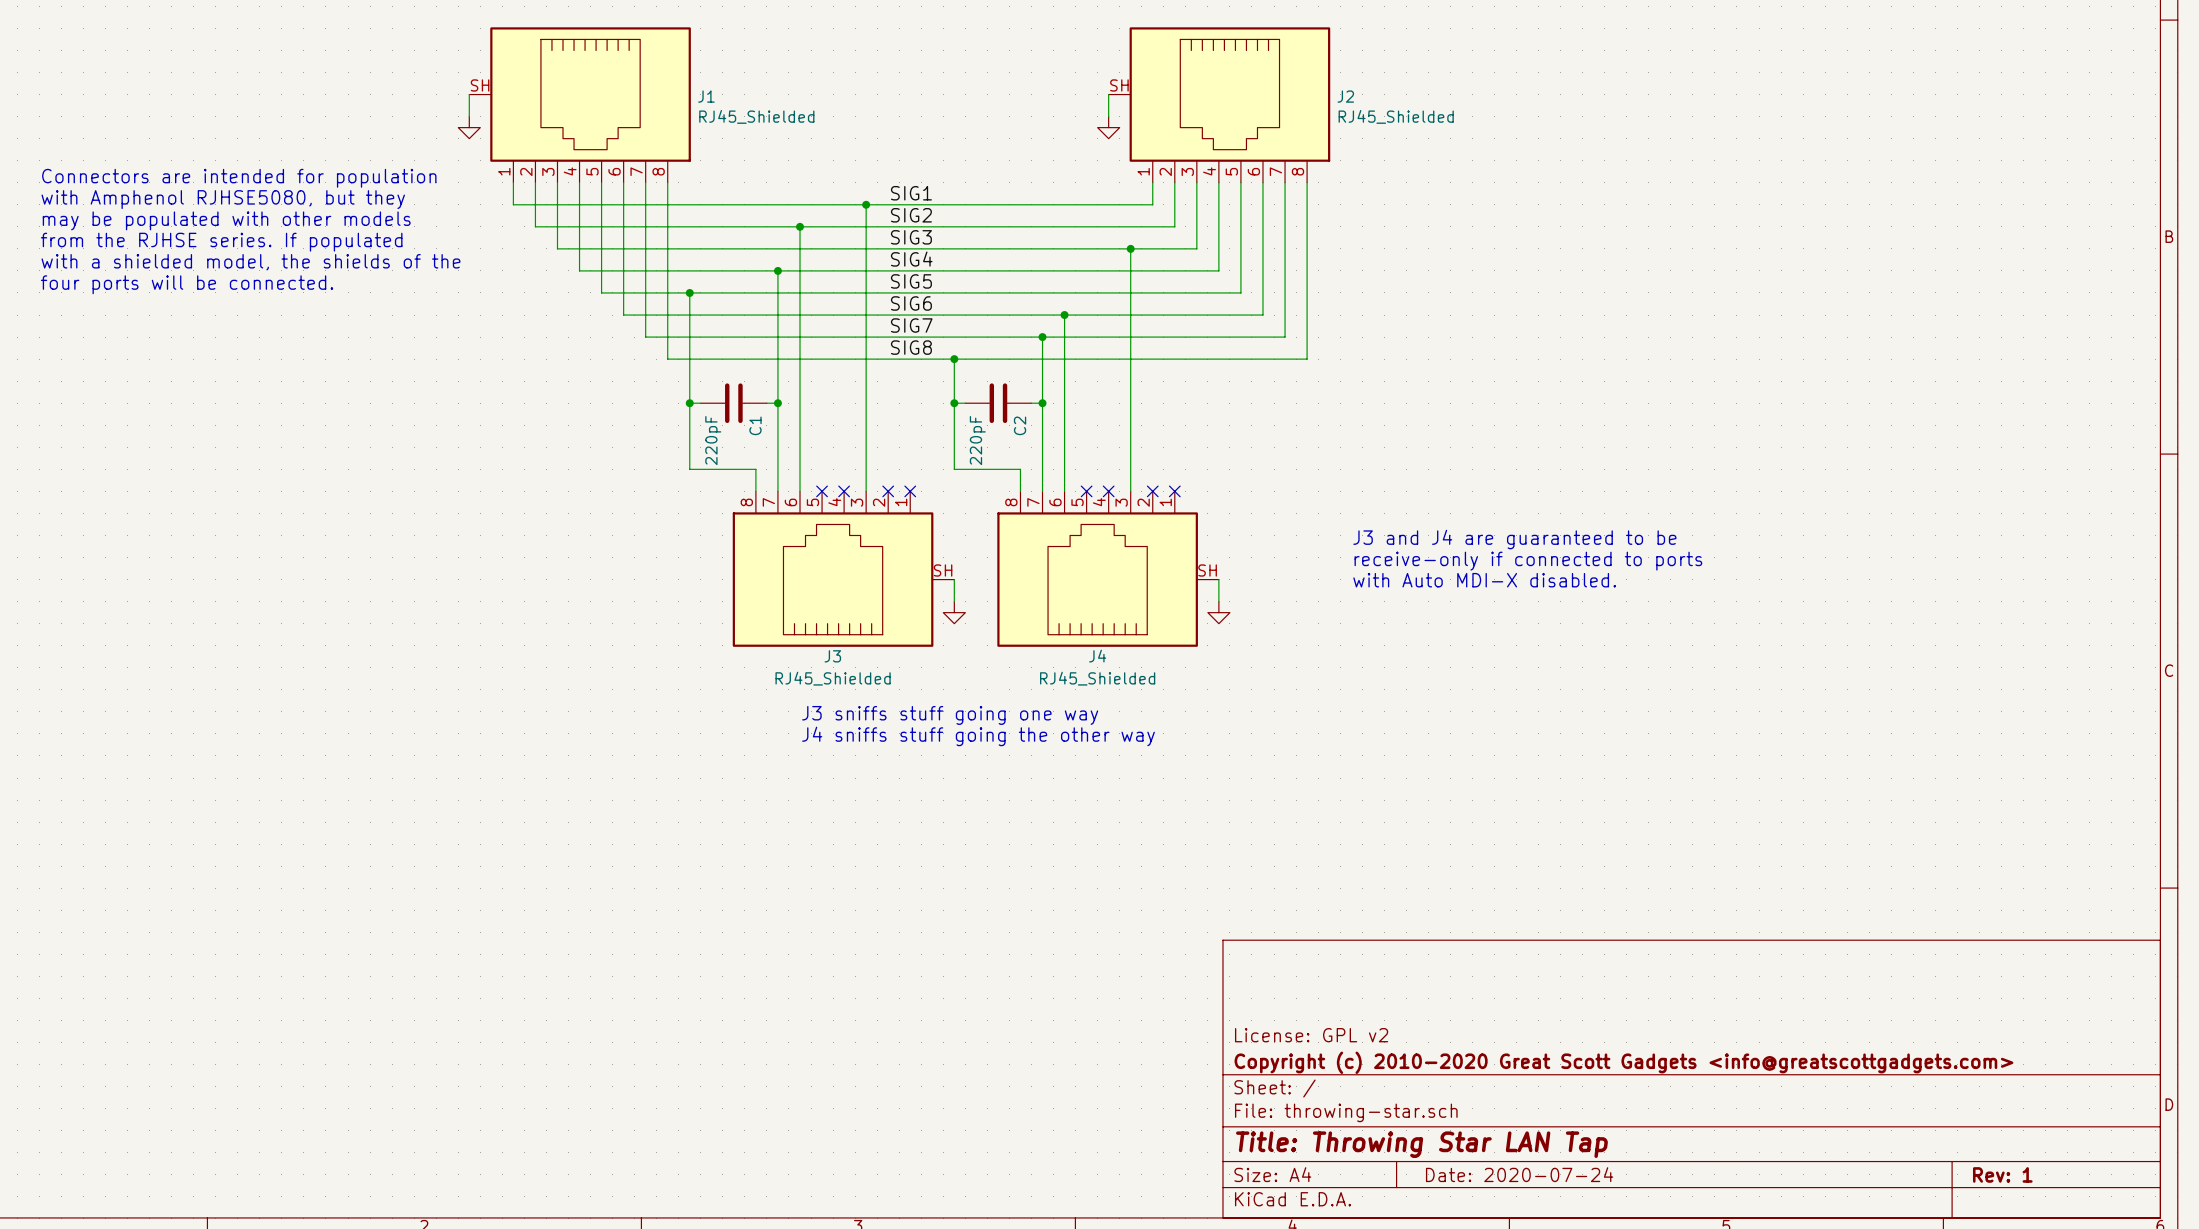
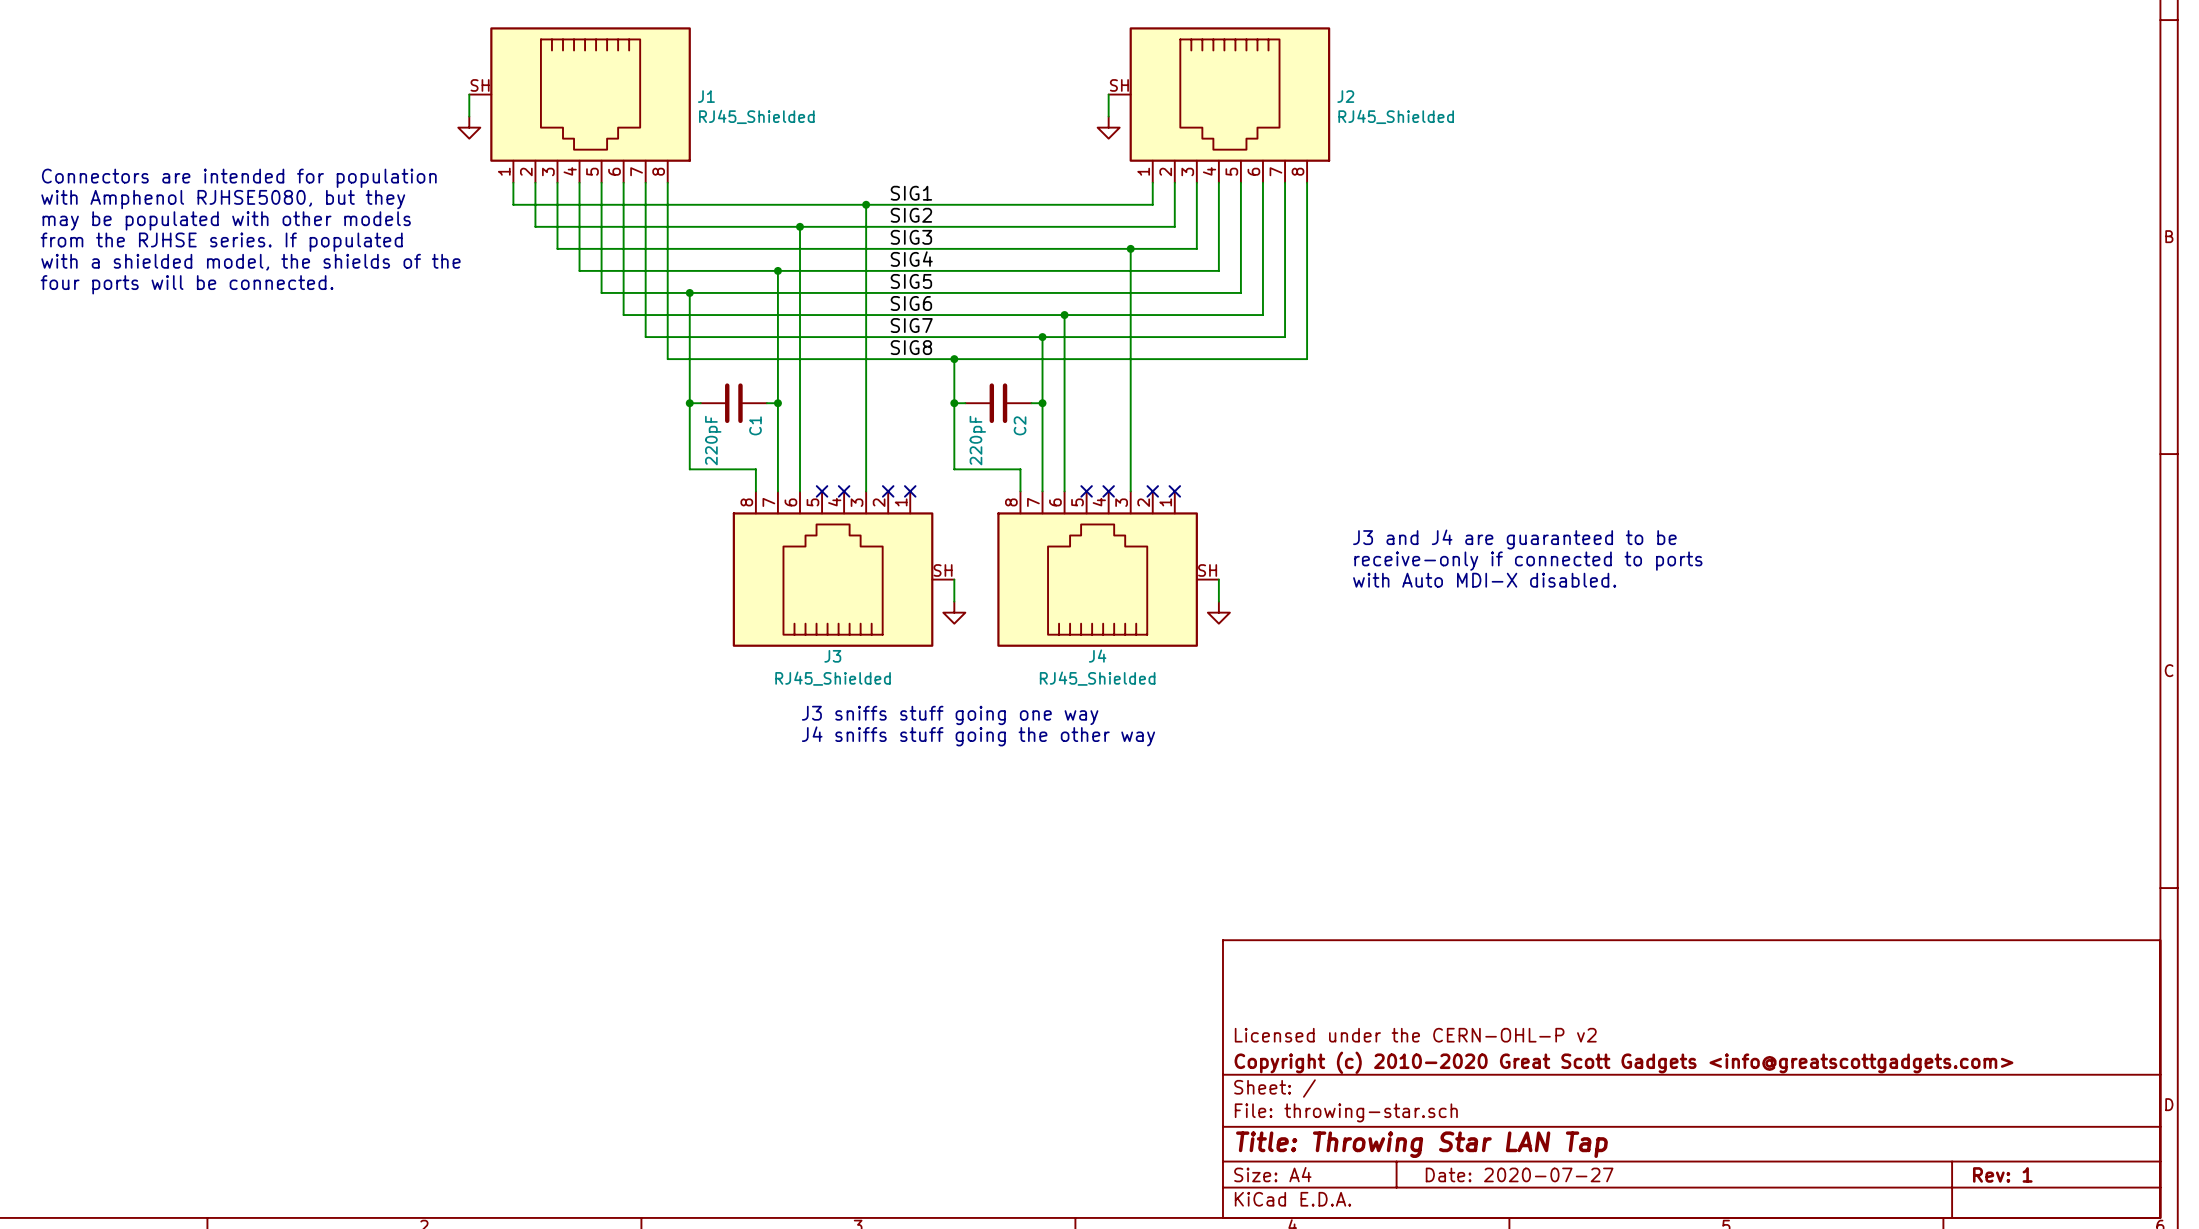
title block: License: GPL v2 (1311, 1035) -> Licensed under the CERN-OHL-P v2 (1415, 1035)
title block: Date: 2020-07-24 (1519, 1174) -> Date: 2020-07-27 (1519, 1174)

